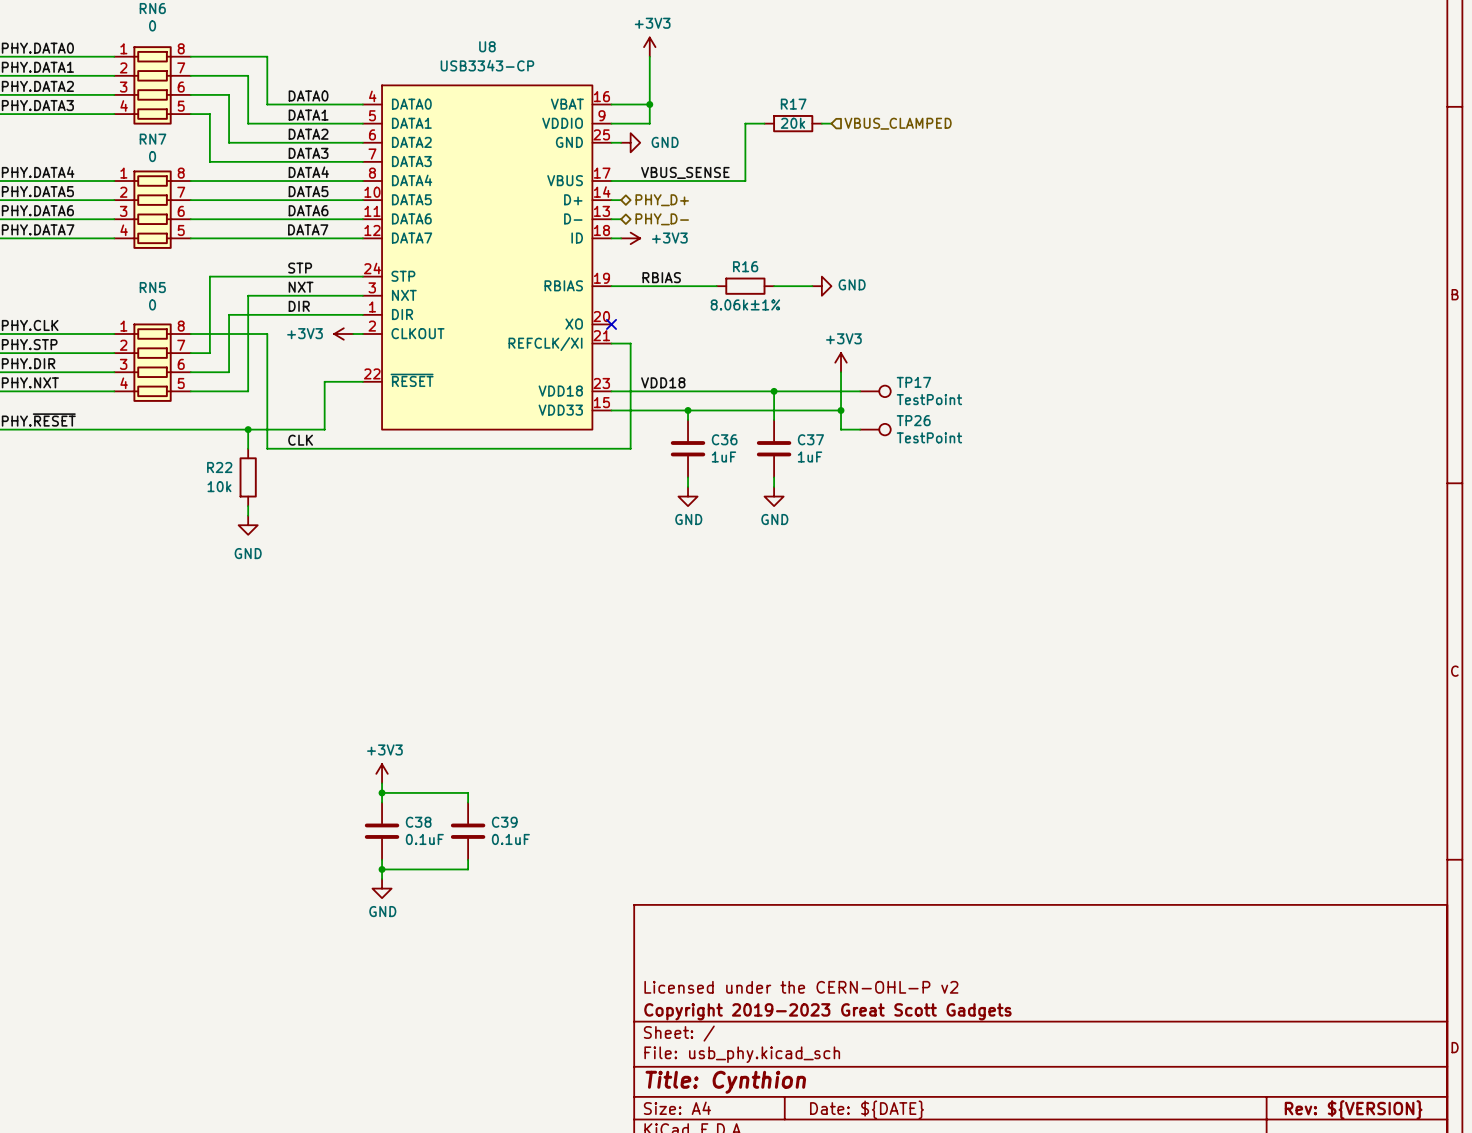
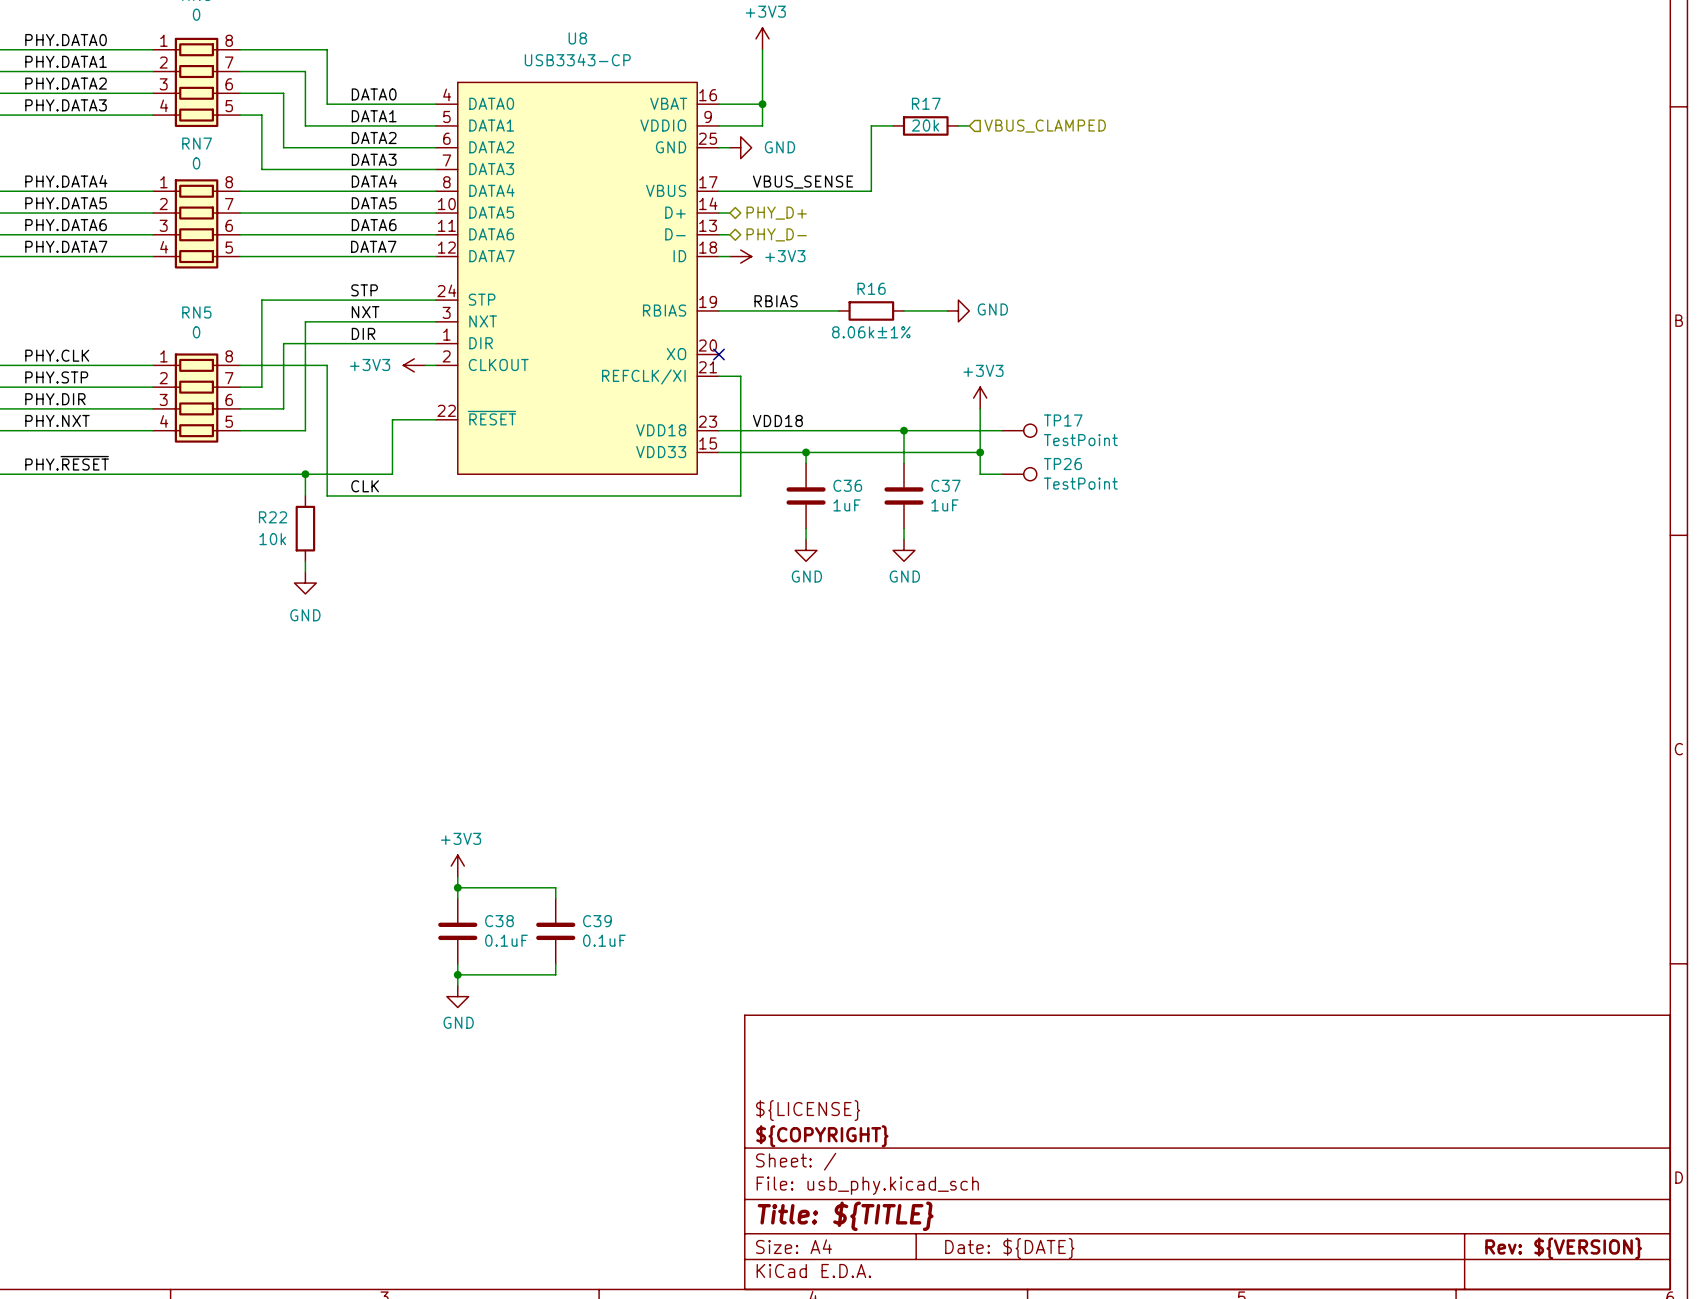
title block: Licensed under the CERN-OHL-P v2 (801, 987) -> ${LICENSE} (808, 1110)
title block: Copyright 2019-2023 Great Scott Gadgets (827, 1011) -> ${COPYRIGHT} (822, 1136)
title block: Title: Cynthion (725, 1082) -> Title: ${TITLE} (845, 1216)

